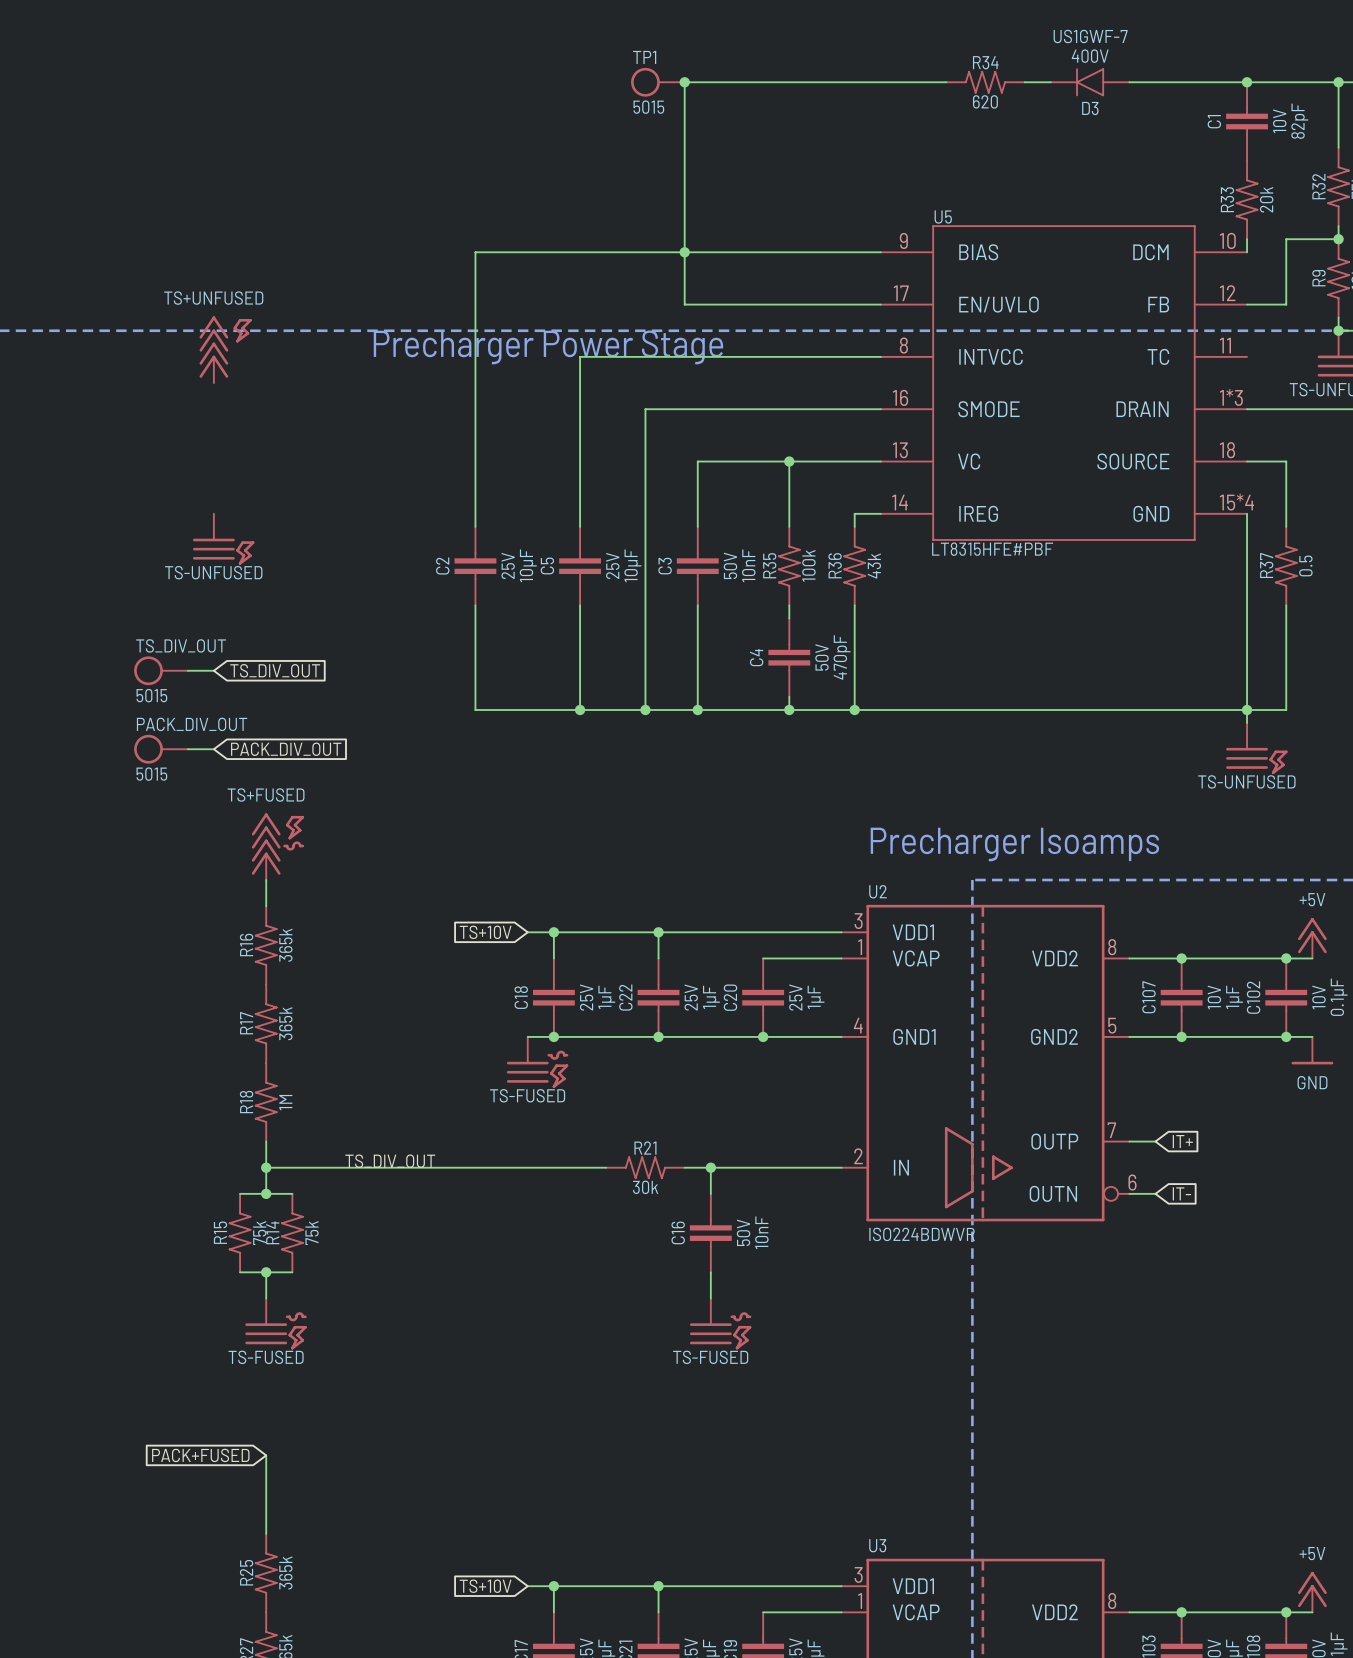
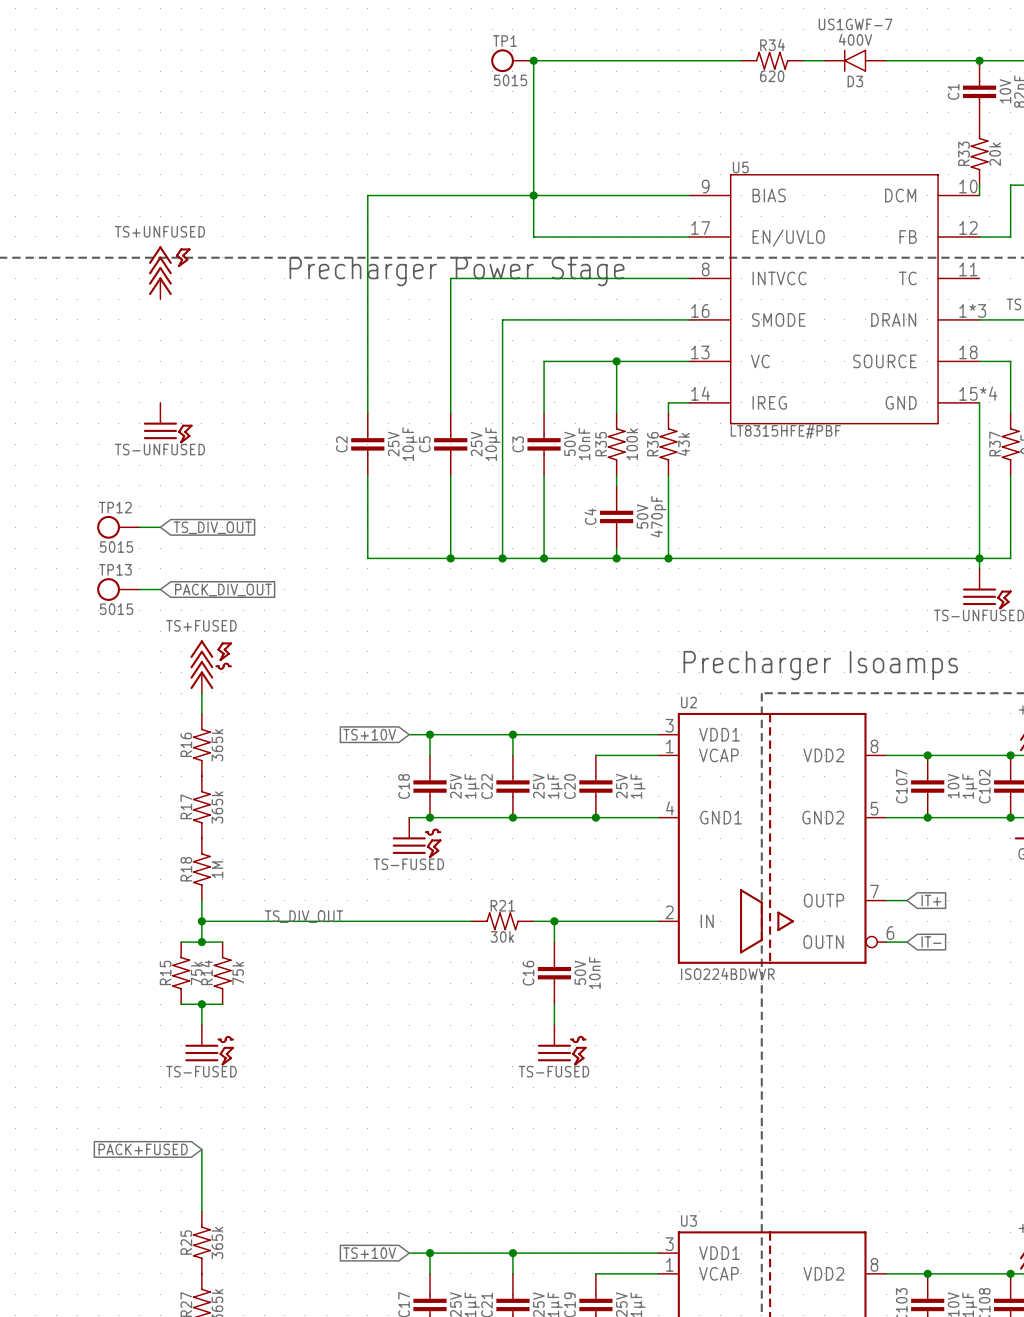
TS_DIV_OUT name: TS_DIV_OUT (181, 645) -> TP12 (115, 507)
PACK_DIV_OUT name: PACK_DIV_OUT (192, 724) -> TP13 (115, 569)

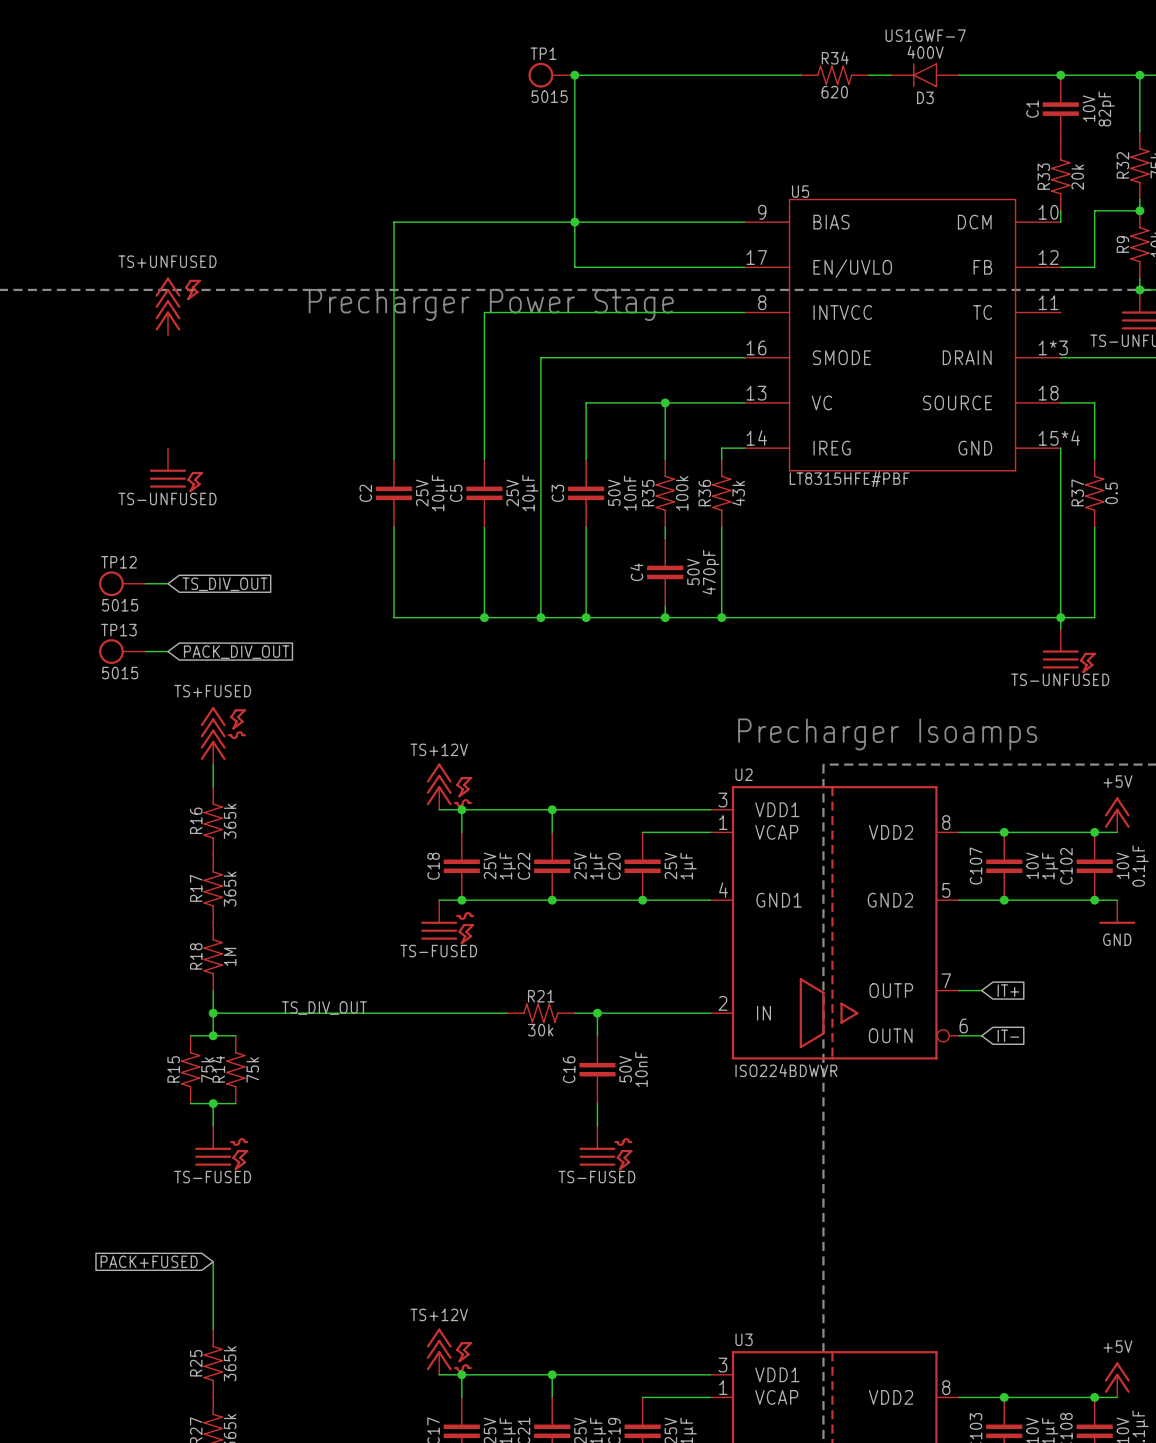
power symbol: none -> TS+12V (449, 786)
global label: TS+10V (369, 734) -> none
power symbol: none -> TS+12V (449, 1351)
global label: TS+10V (369, 1253) -> none

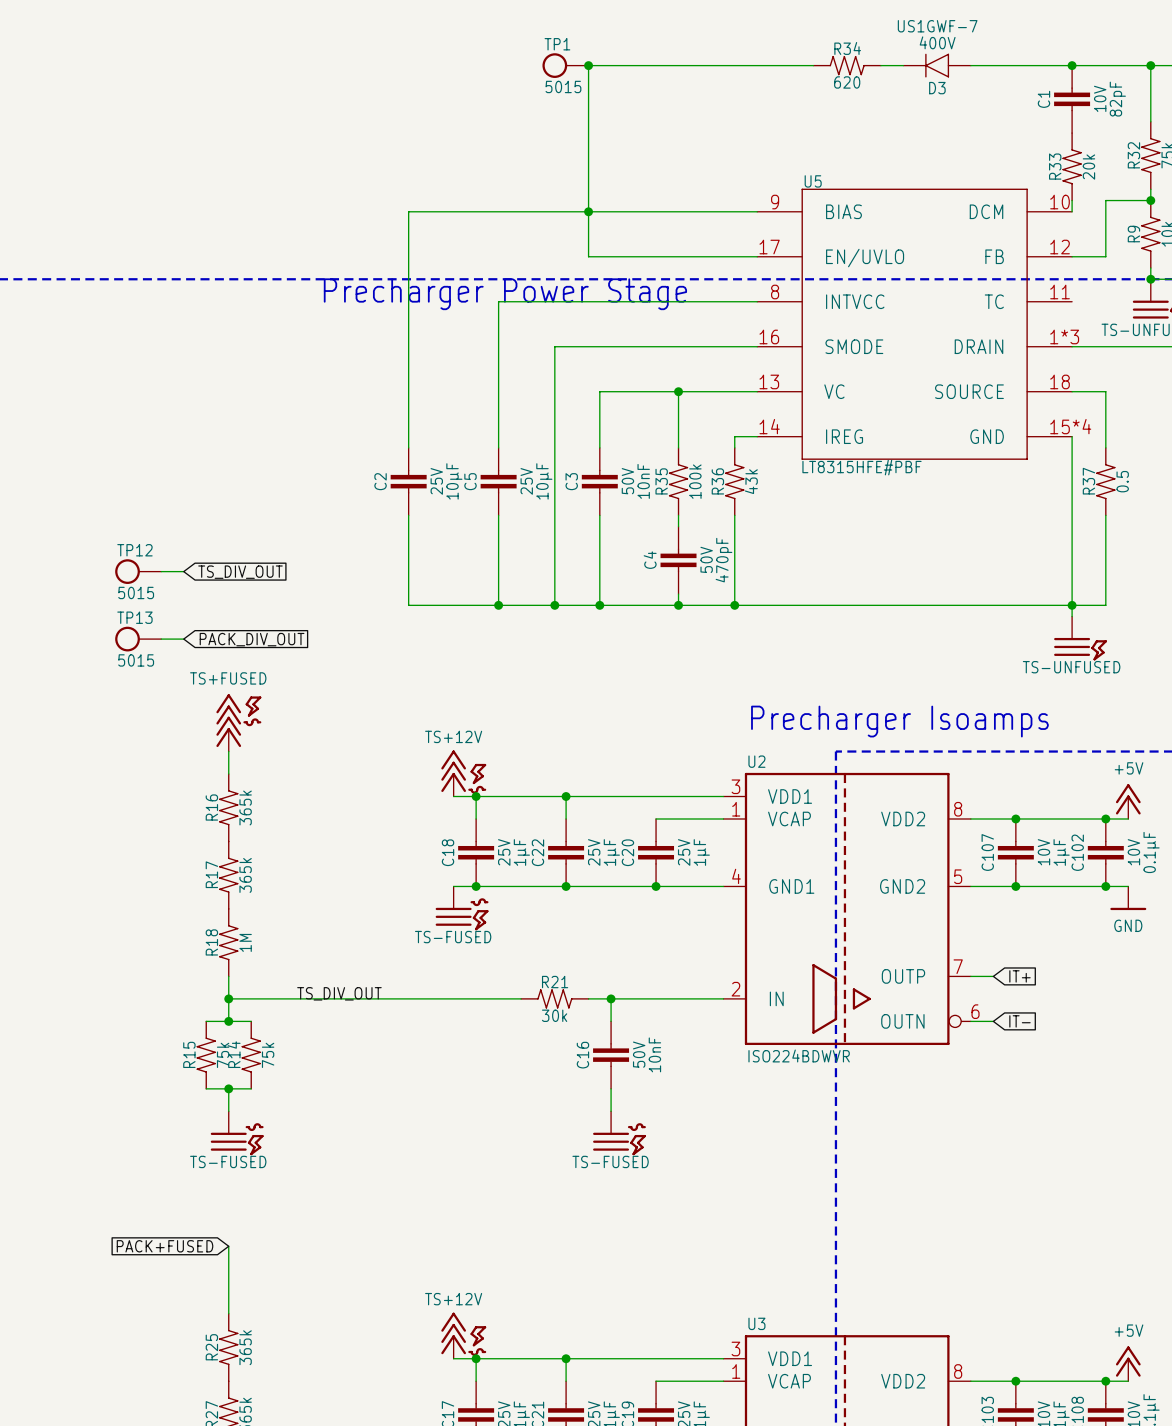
power symbol: TS+UNFUSED (178, 306) -> none
power symbol: TS-UNFUSED (176, 470) -> none

